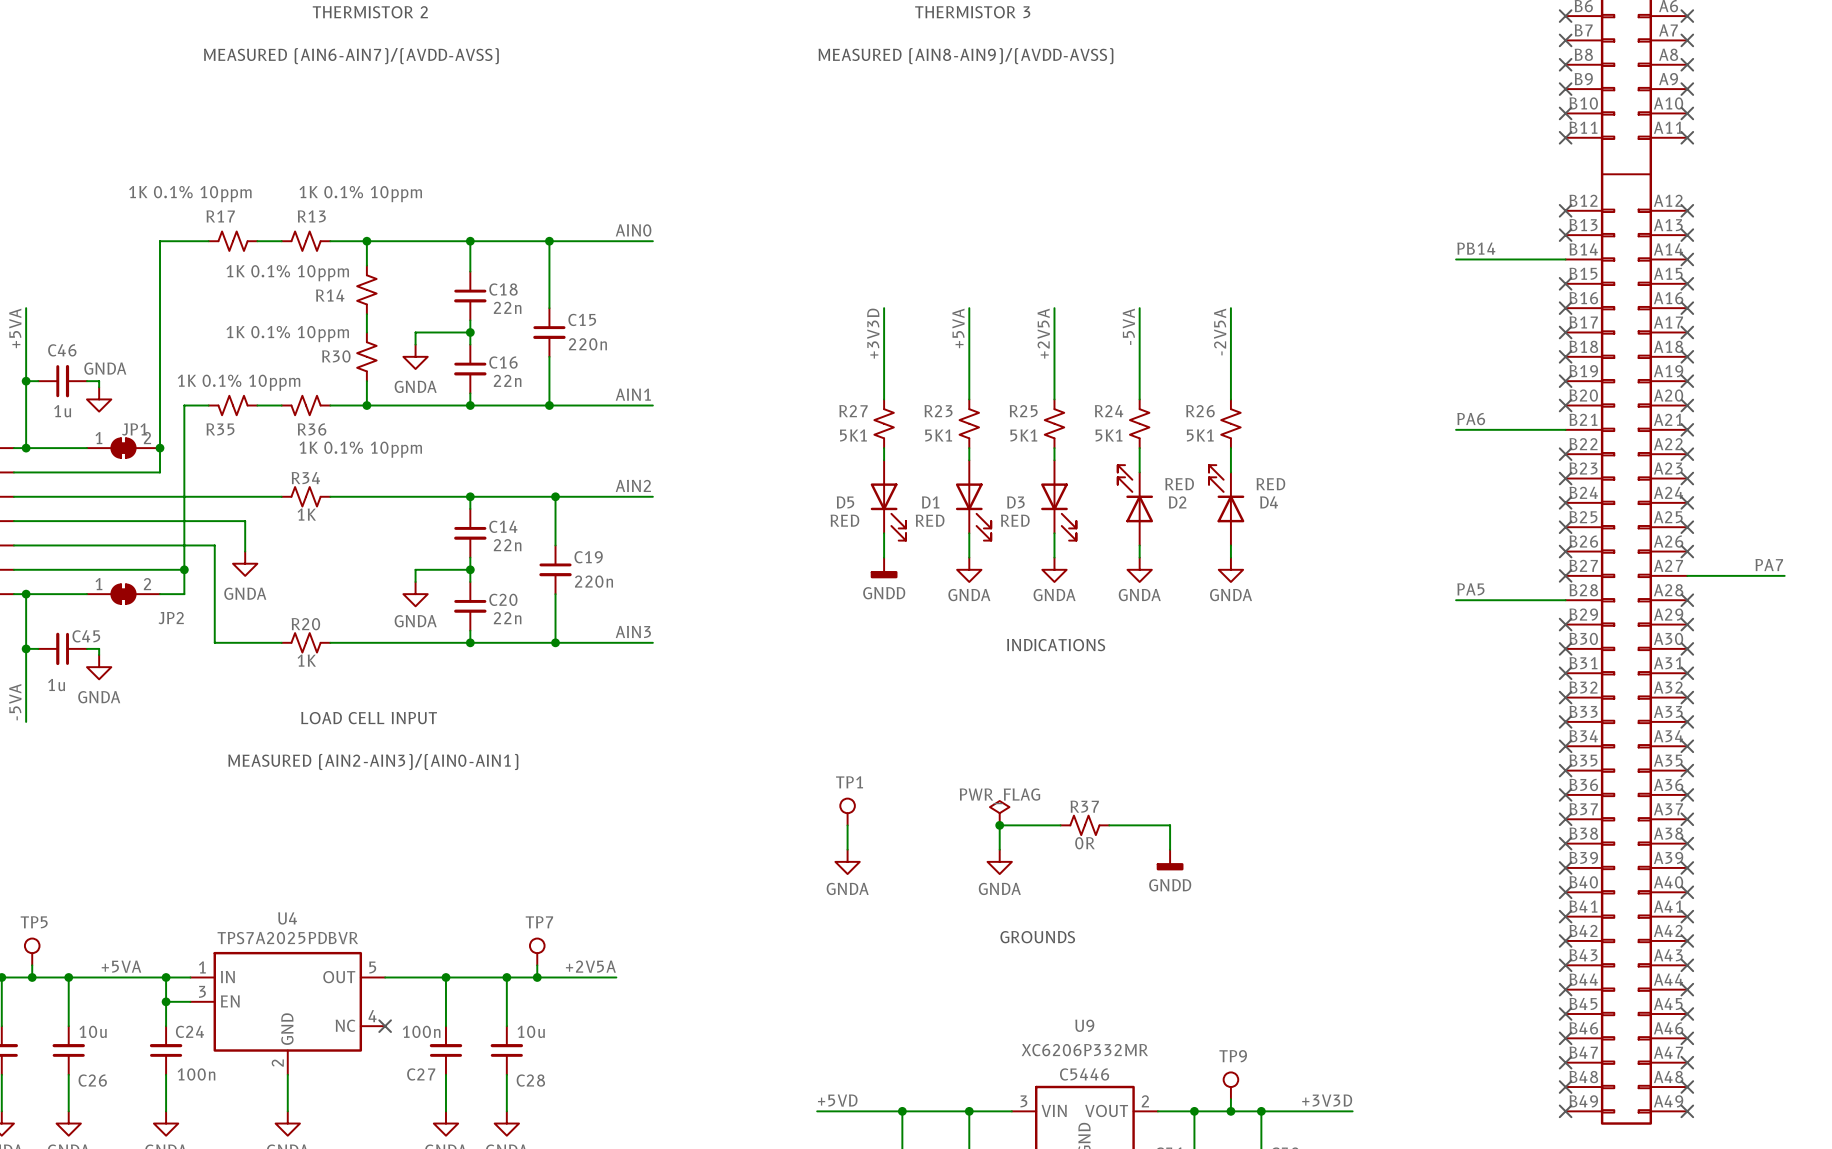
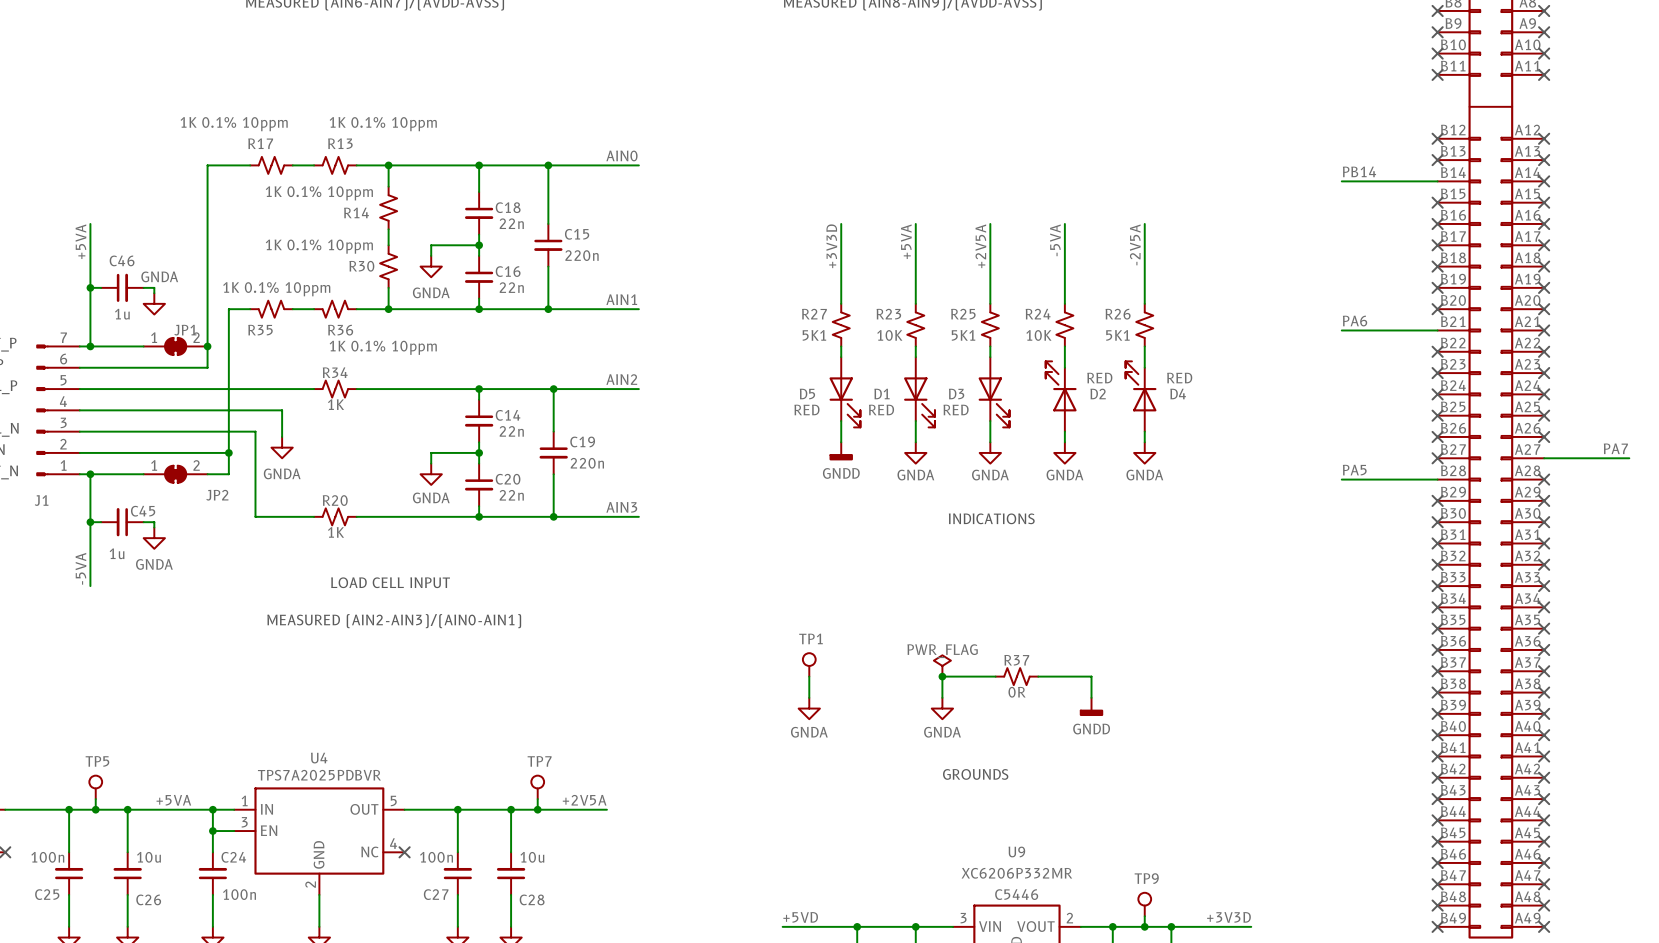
R23 value: 5K1 (938, 435) -> 10K (889, 335)
R24 value: 5K1 (1109, 435) -> 10K (1038, 335)

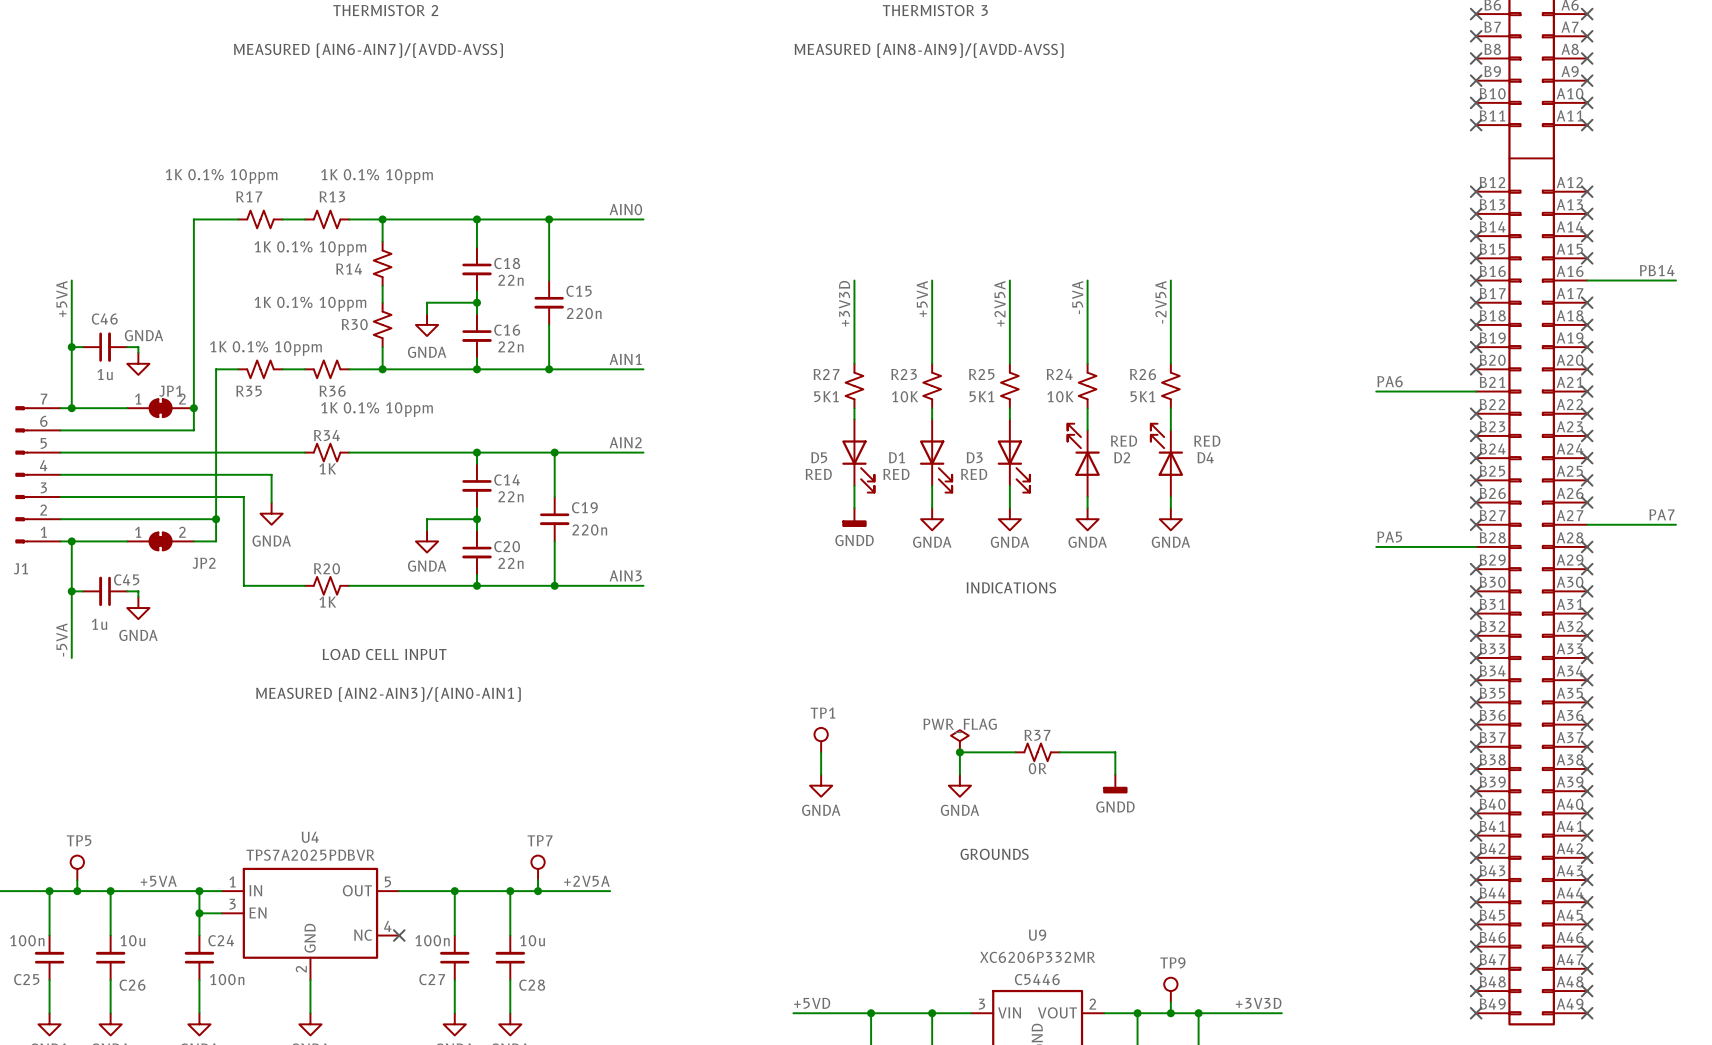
label: PB14 (1359, 171) -> none
wire: (1341, 181) (1437, 181) -> none
no-connect mark: none -> (1476, 236)
label: none -> PB14 (1657, 270)
wire: none -> (1587, 280) (1675, 280)
no-connect mark: (1544, 223) -> none

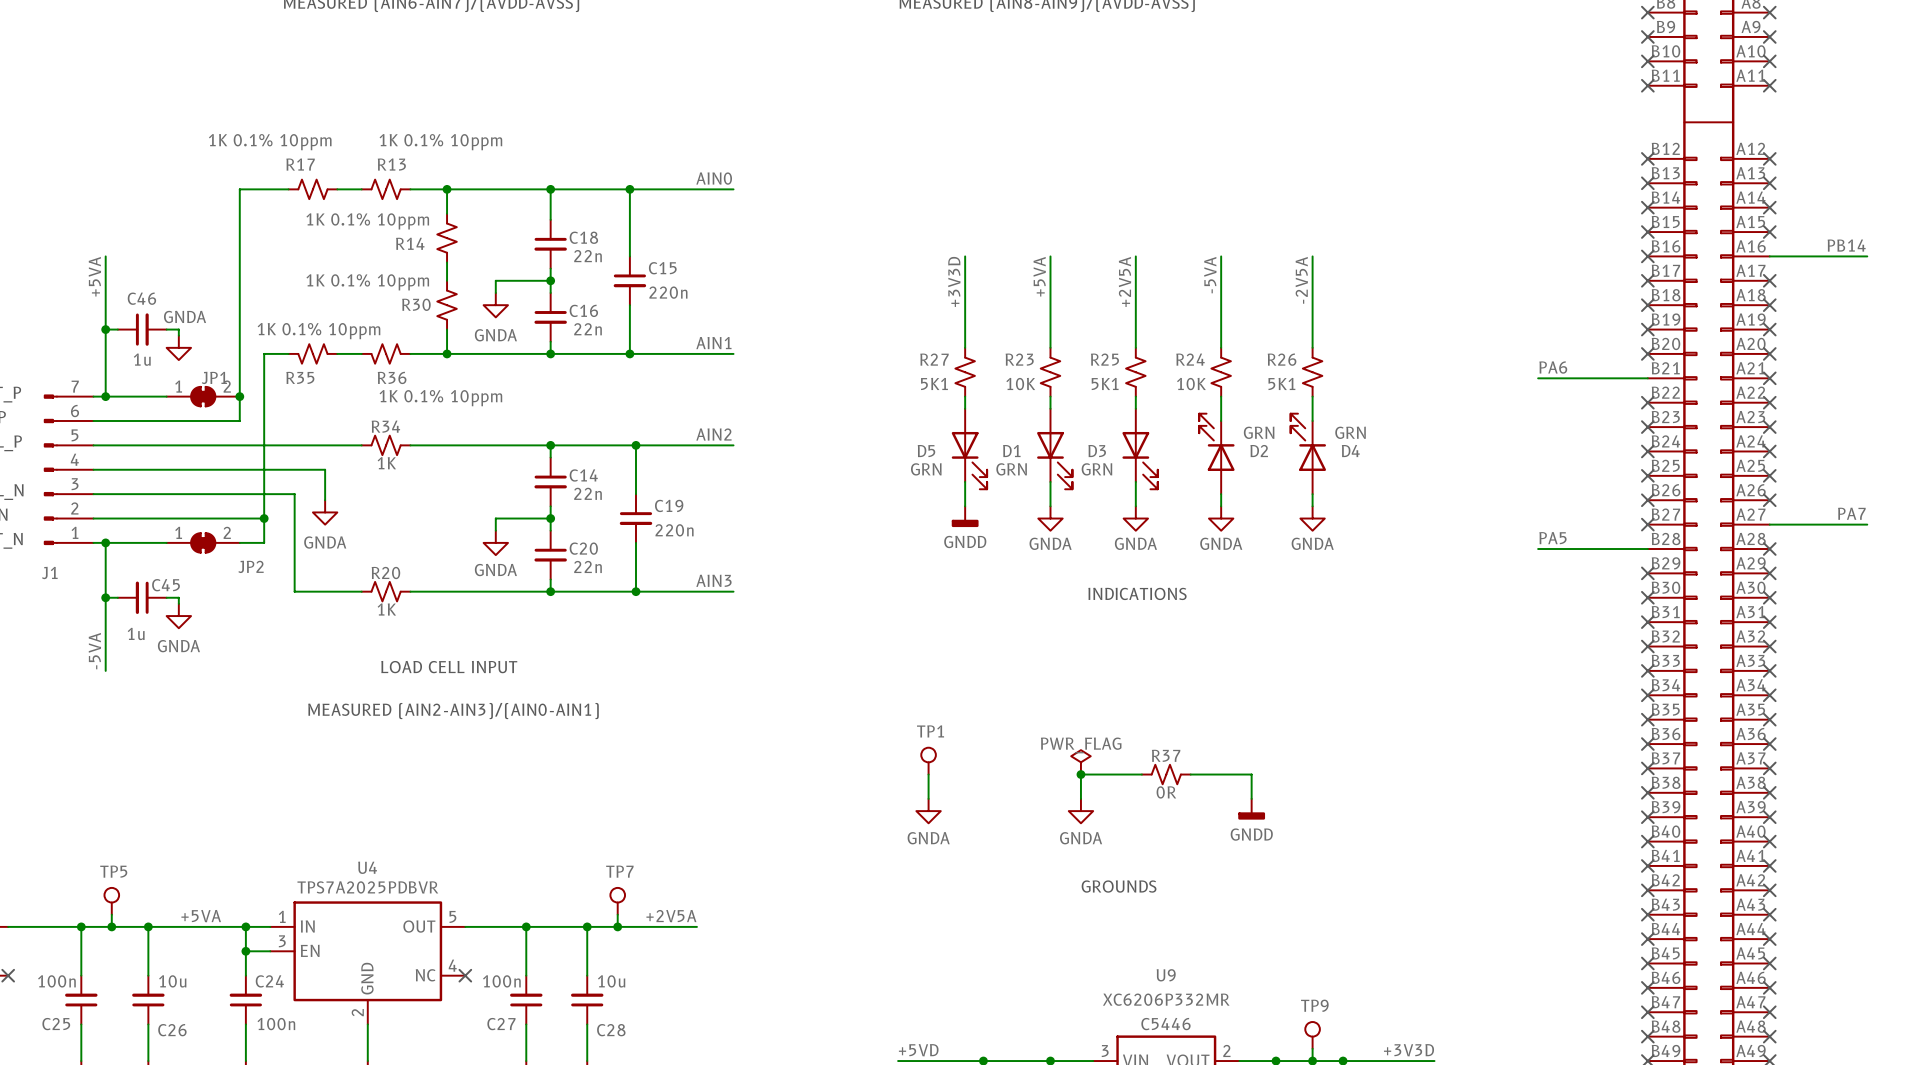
D2 value: RED (1124, 441) -> GRN (1259, 432)
D4 value: RED (1207, 441) -> GRN (1350, 432)
D5 value: RED (818, 474) -> GRN (926, 469)
D1 value: RED (896, 474) -> GRN (1011, 469)
D3 value: RED (974, 474) -> GRN (1096, 469)

